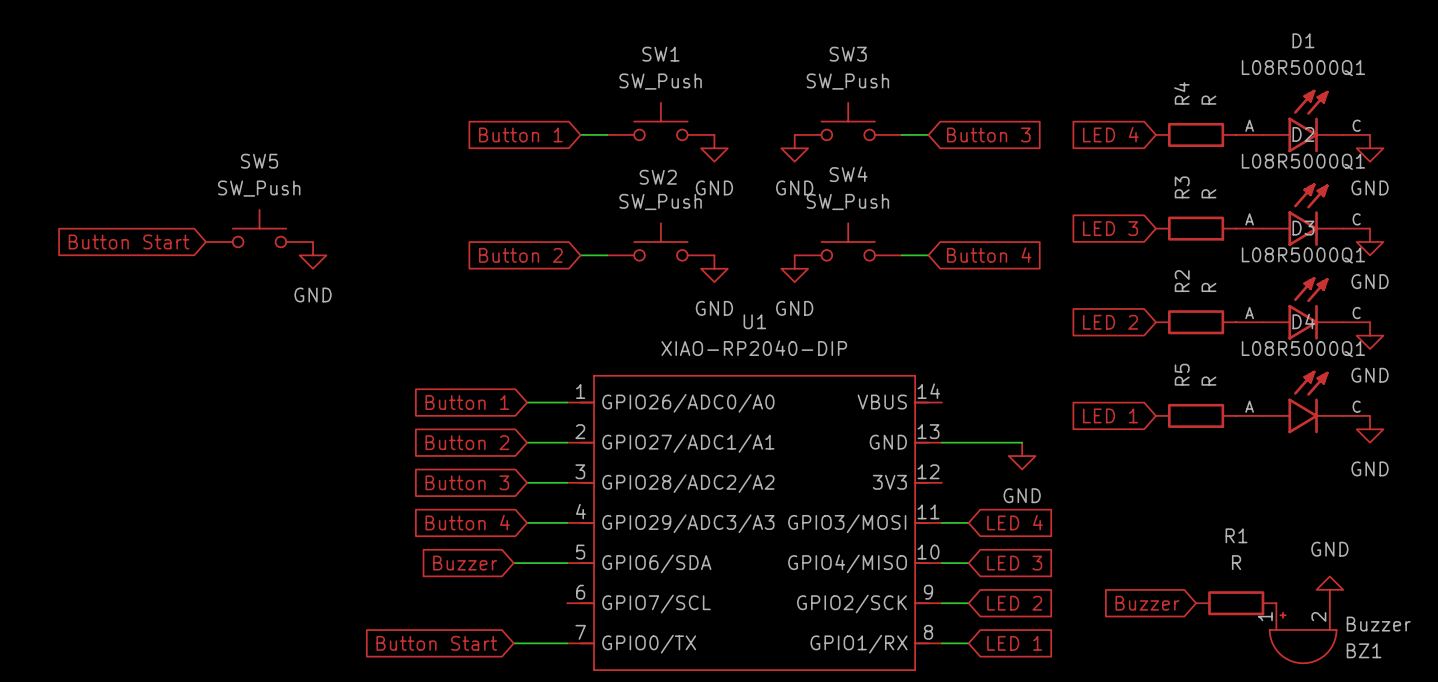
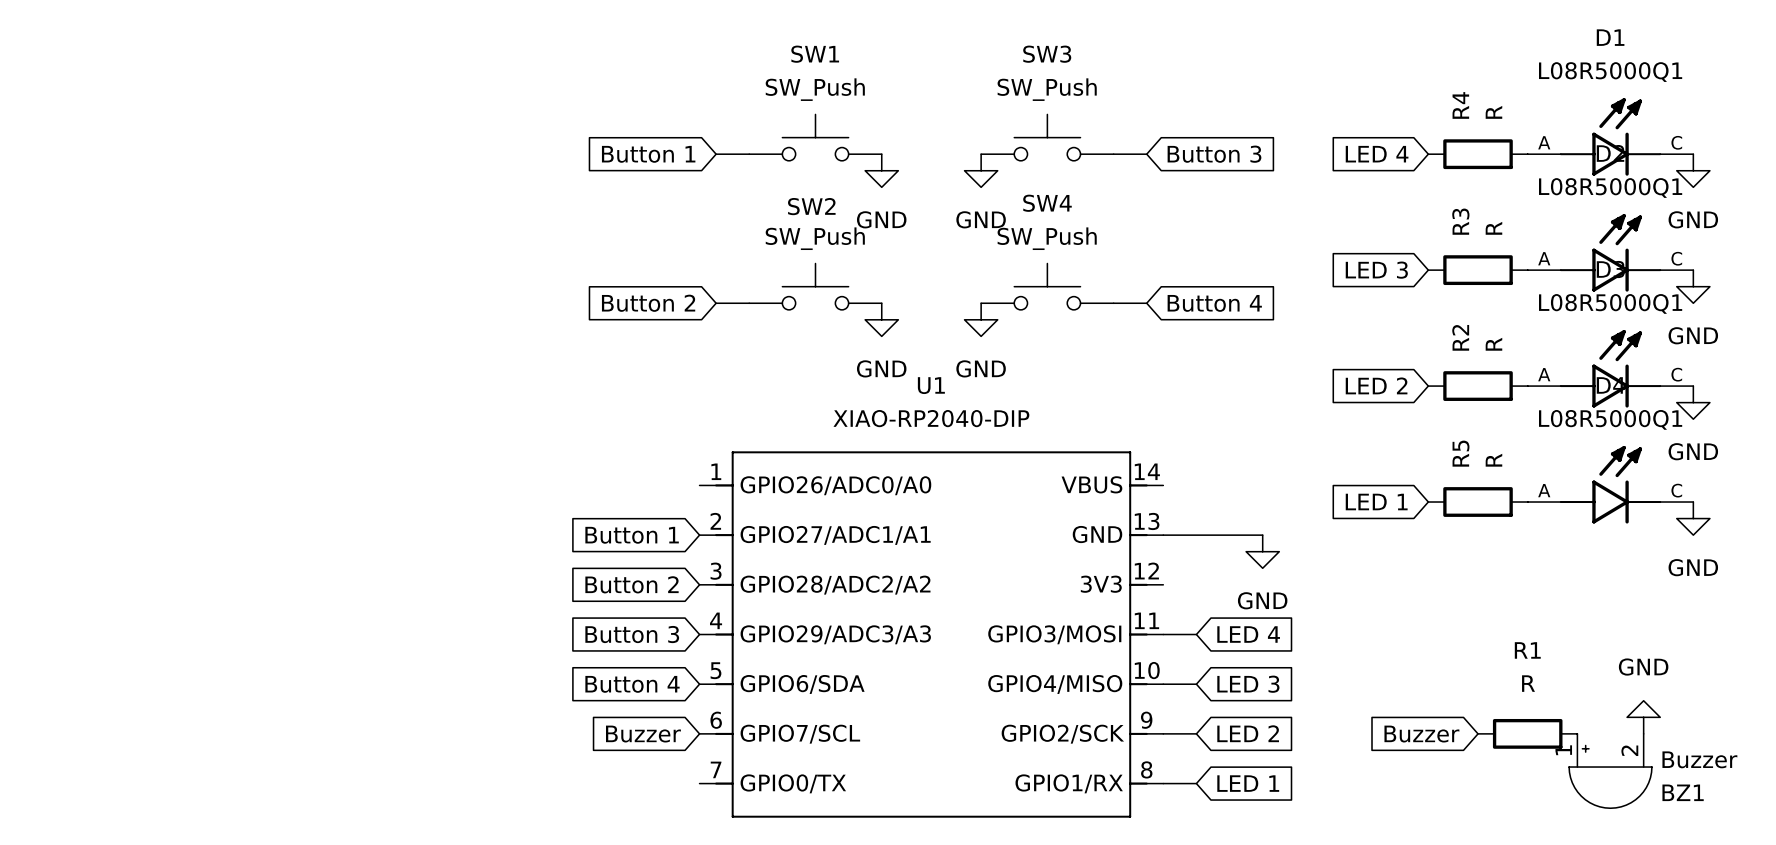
SW5: SW_Push (259, 228) -> none
global label: Button Start (129, 241) -> none
power symbol: GND (313, 255) -> none
global label position: Button 1 (467, 402) -> Button 1 (632, 535)
wire: (527, 402) (567, 402) -> none
global label position: Button 2 (467, 442) -> Button 2 (632, 584)
wire: (527, 442) (567, 442) -> none
global label position: Button 3 (467, 482) -> Button 3 (632, 634)
wire: (527, 482) (567, 482) -> none
global label position: Button 4 (467, 522) -> Button 4 (632, 684)
wire: (527, 522) (567, 522) -> none
global label position: Buzzer (465, 563) -> Buzzer (643, 734)
wire: (513, 563) (567, 563) -> none
global label: Button Start (436, 643) -> none
wire: (513, 643) (567, 643) -> none

